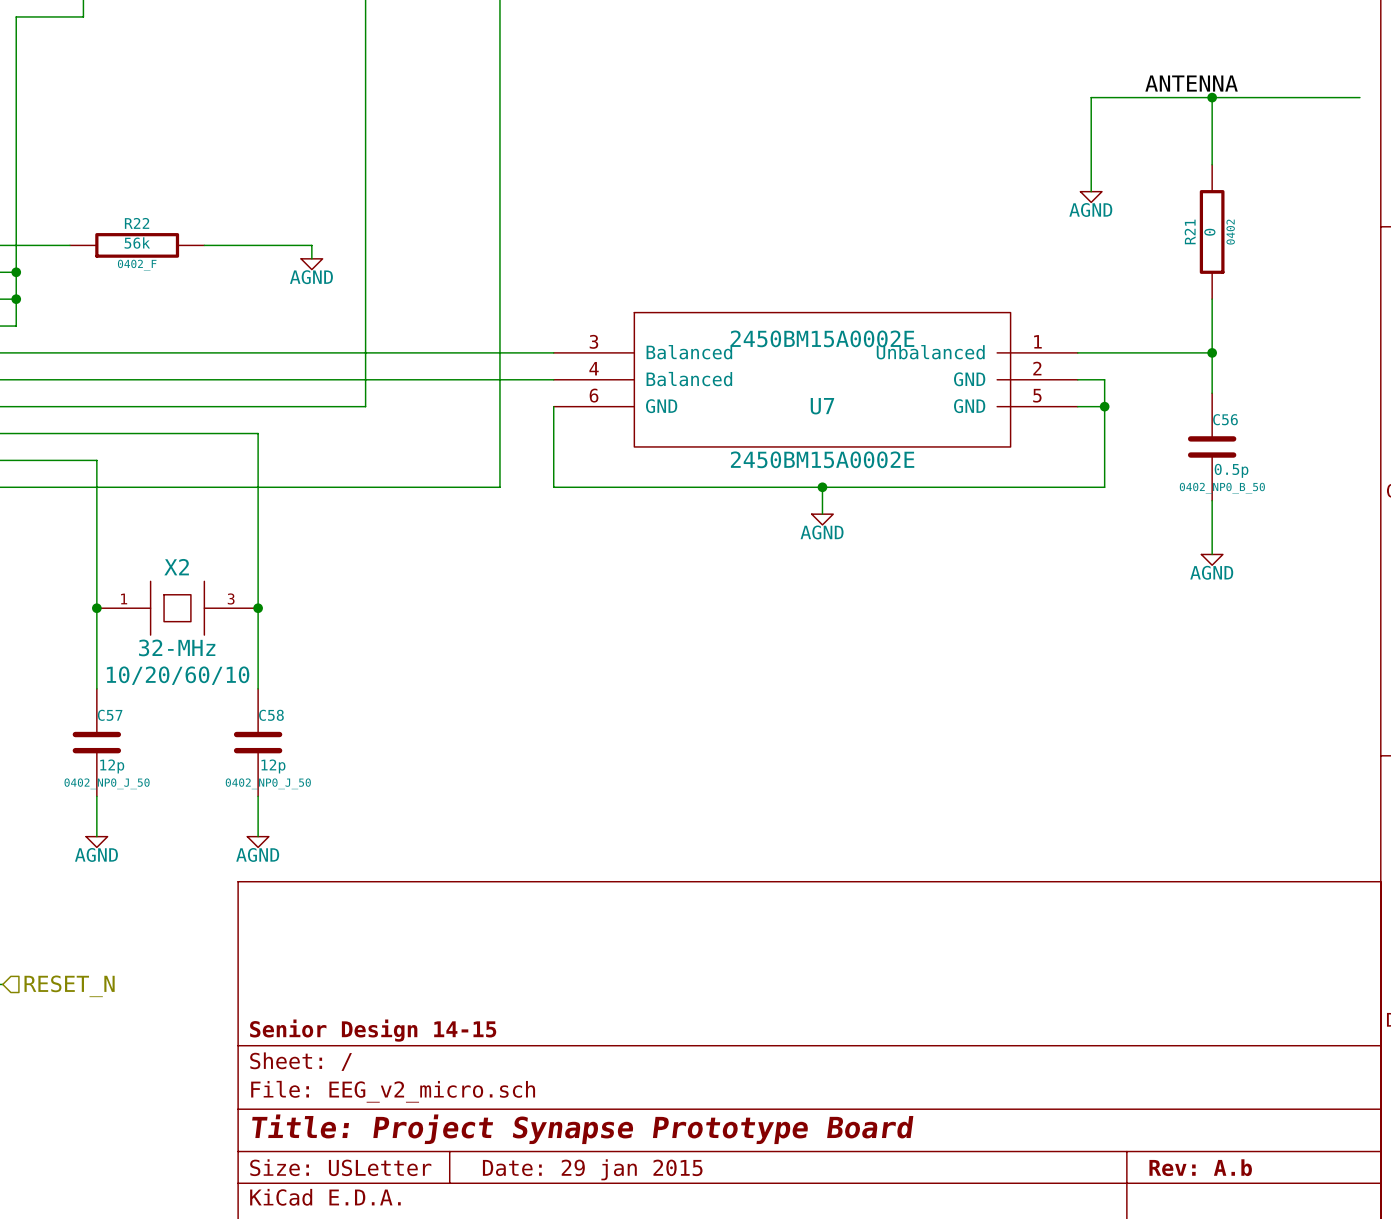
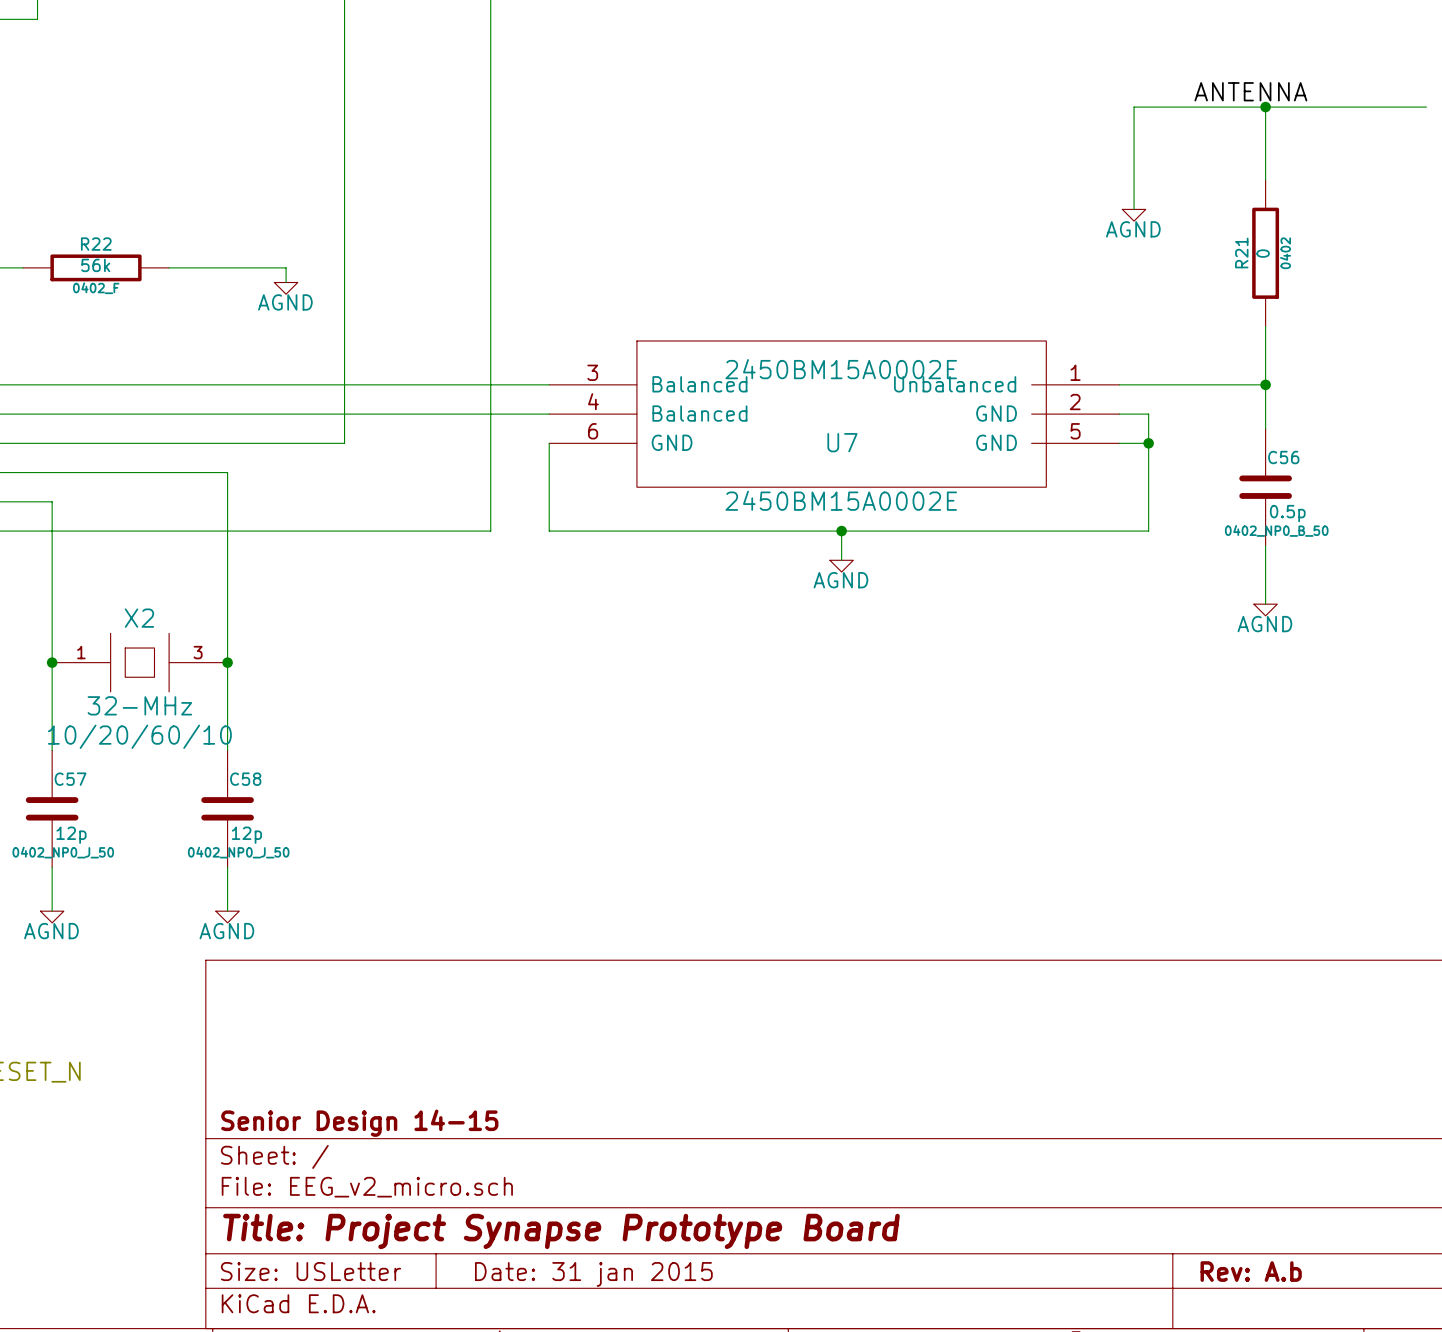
title block: Date: 29 jan 2015 (592, 1169) -> Date: 31 jan 2015 (593, 1274)

